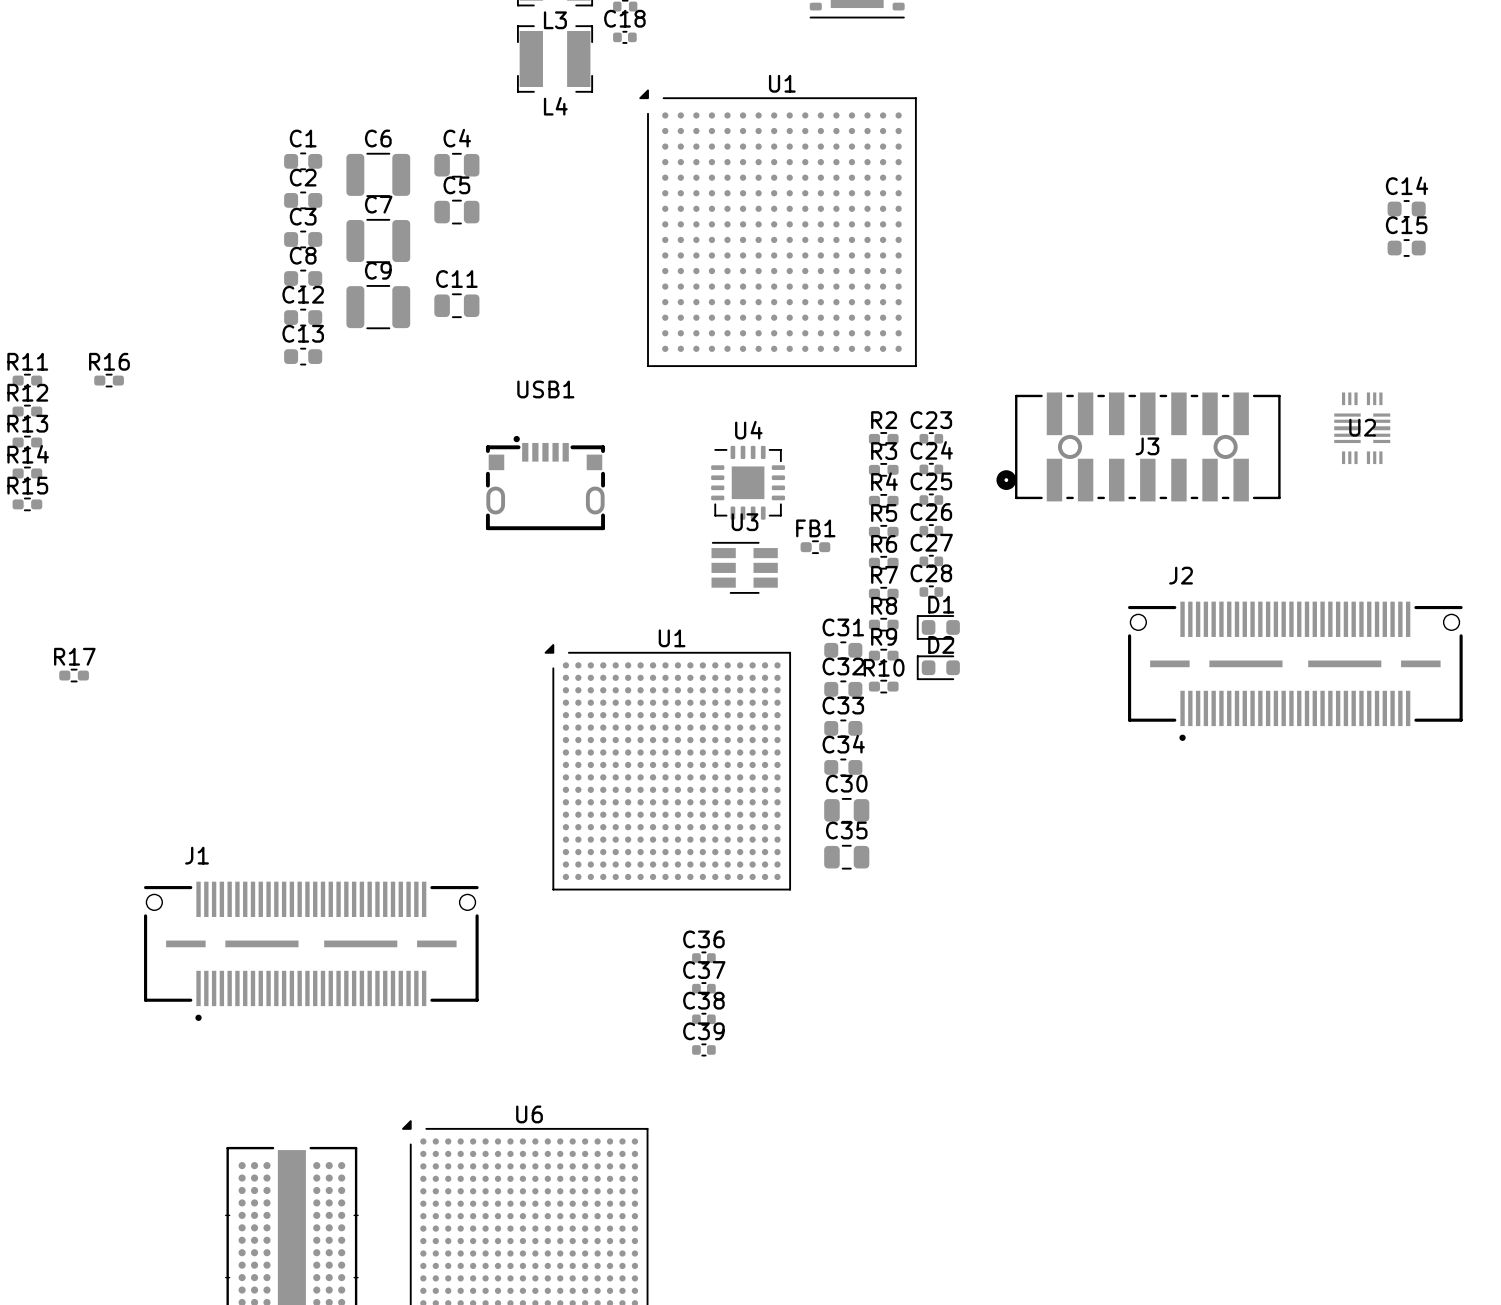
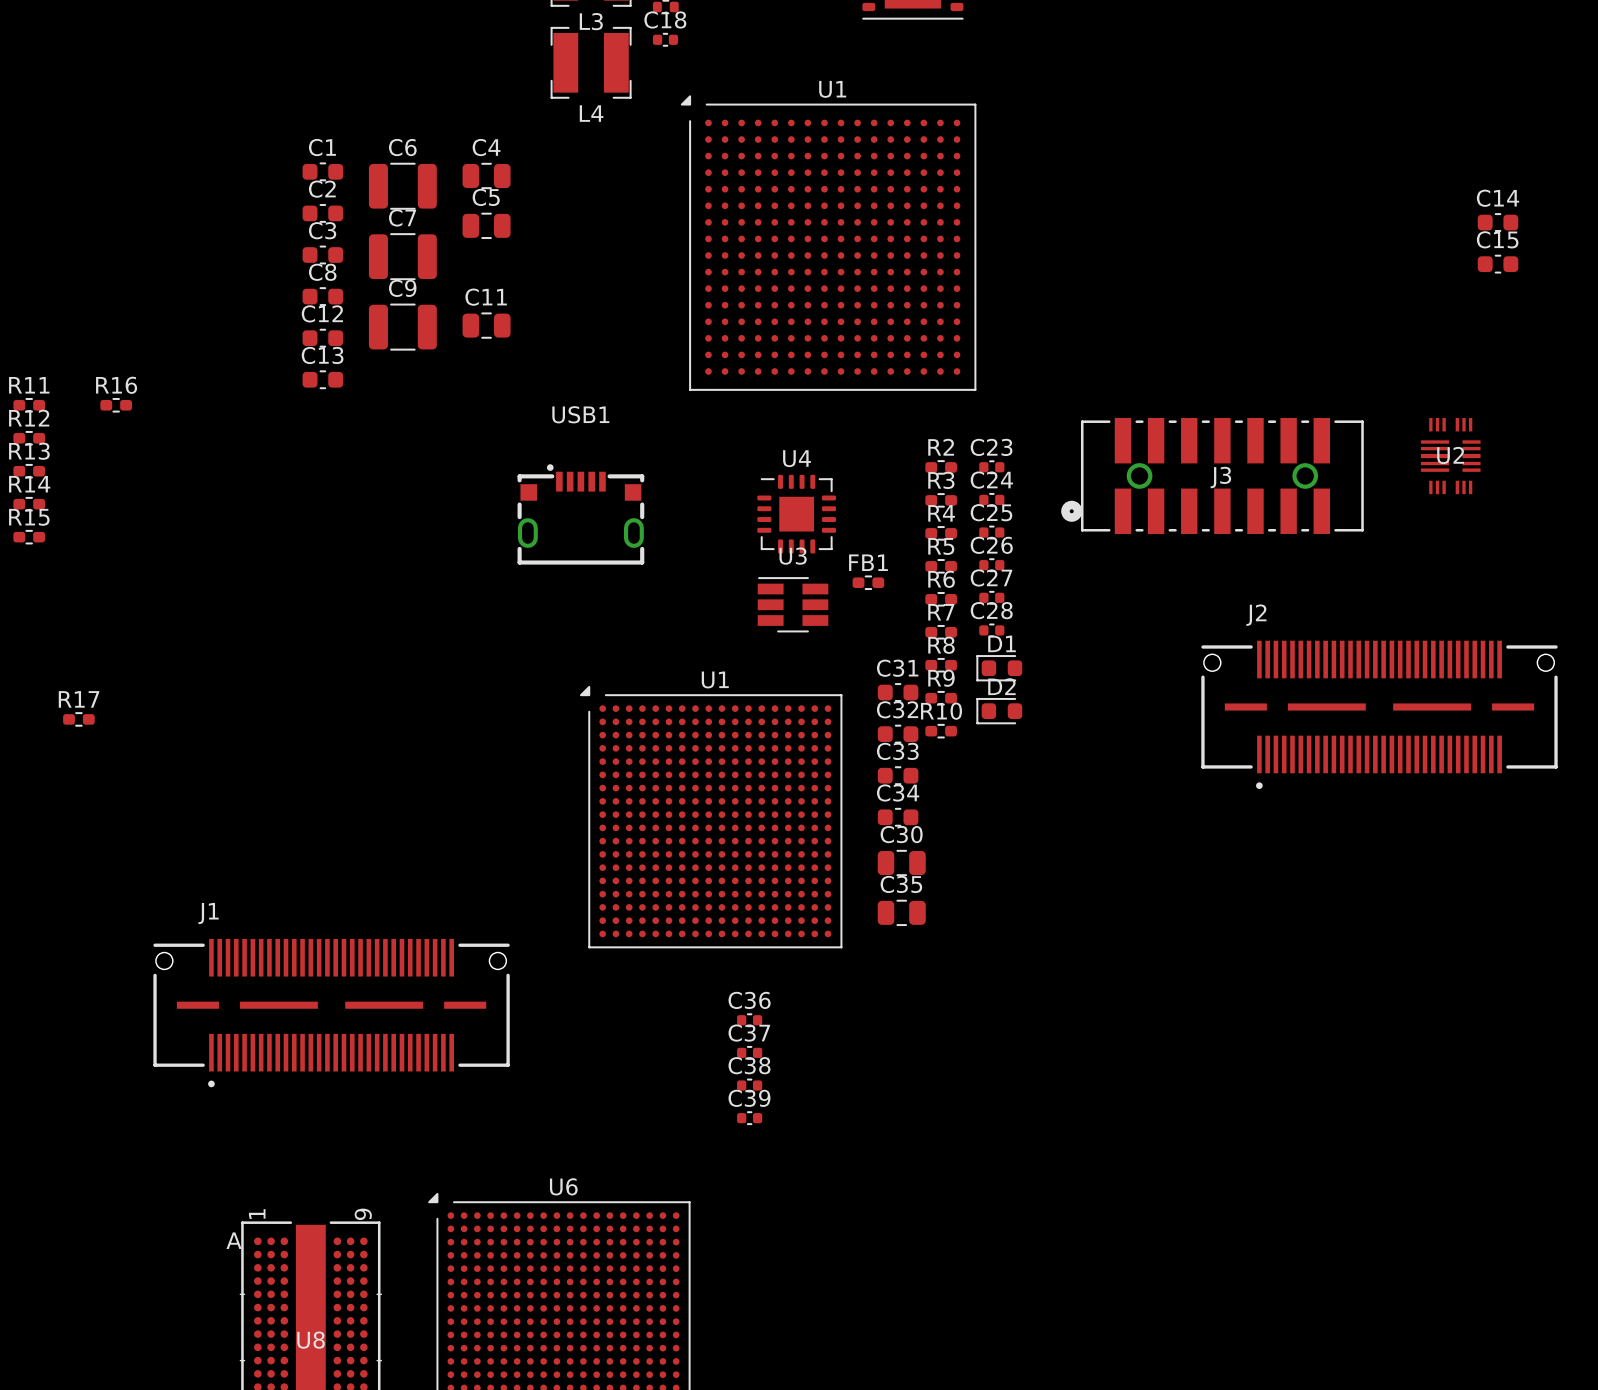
U8 text: none -> 1 (257, 1214)
U8 text: none -> 9 (363, 1214)
U8 text: none -> A (234, 1240)
U8 name: none -> U8 (311, 1340)

